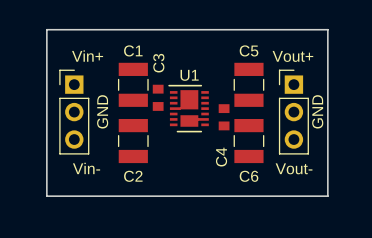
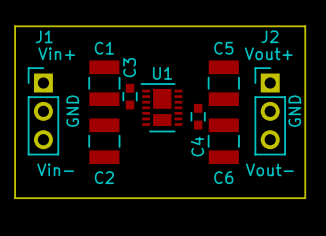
J1 name: none -> J1 (44, 36)
J2 name: none -> J2 (269, 36)
C3 footprint: [152, 84, 164, 111] -> [122, 83, 138, 110]
U1 footprint: [168, 84, 209, 133] -> [140, 83, 183, 133]
C4 footprint: [218, 104, 230, 131] -> [190, 103, 206, 130]

